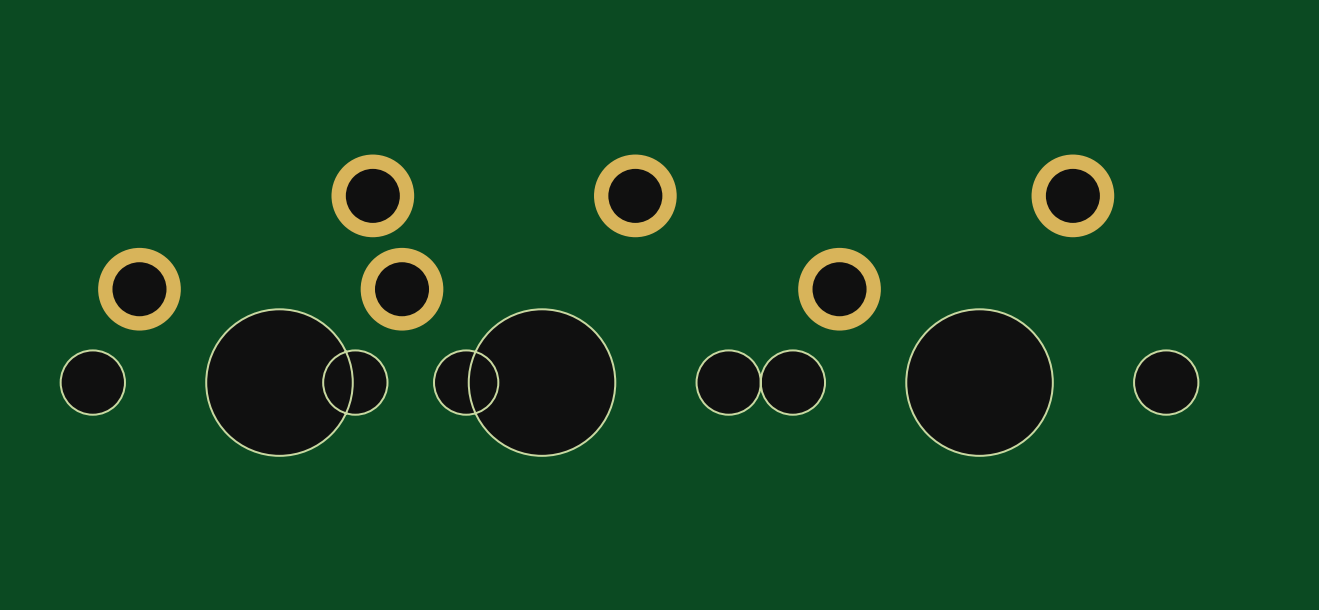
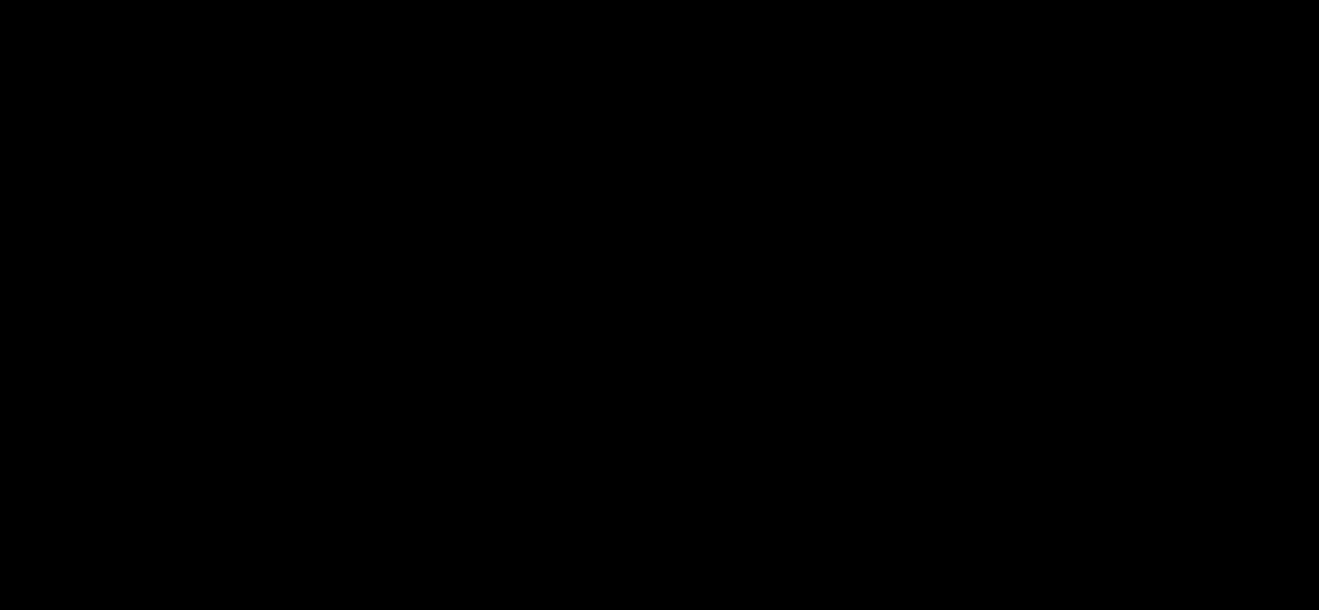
part: (279, 305) -> none
part: (542, 305) -> none
part: (979, 305) -> none

